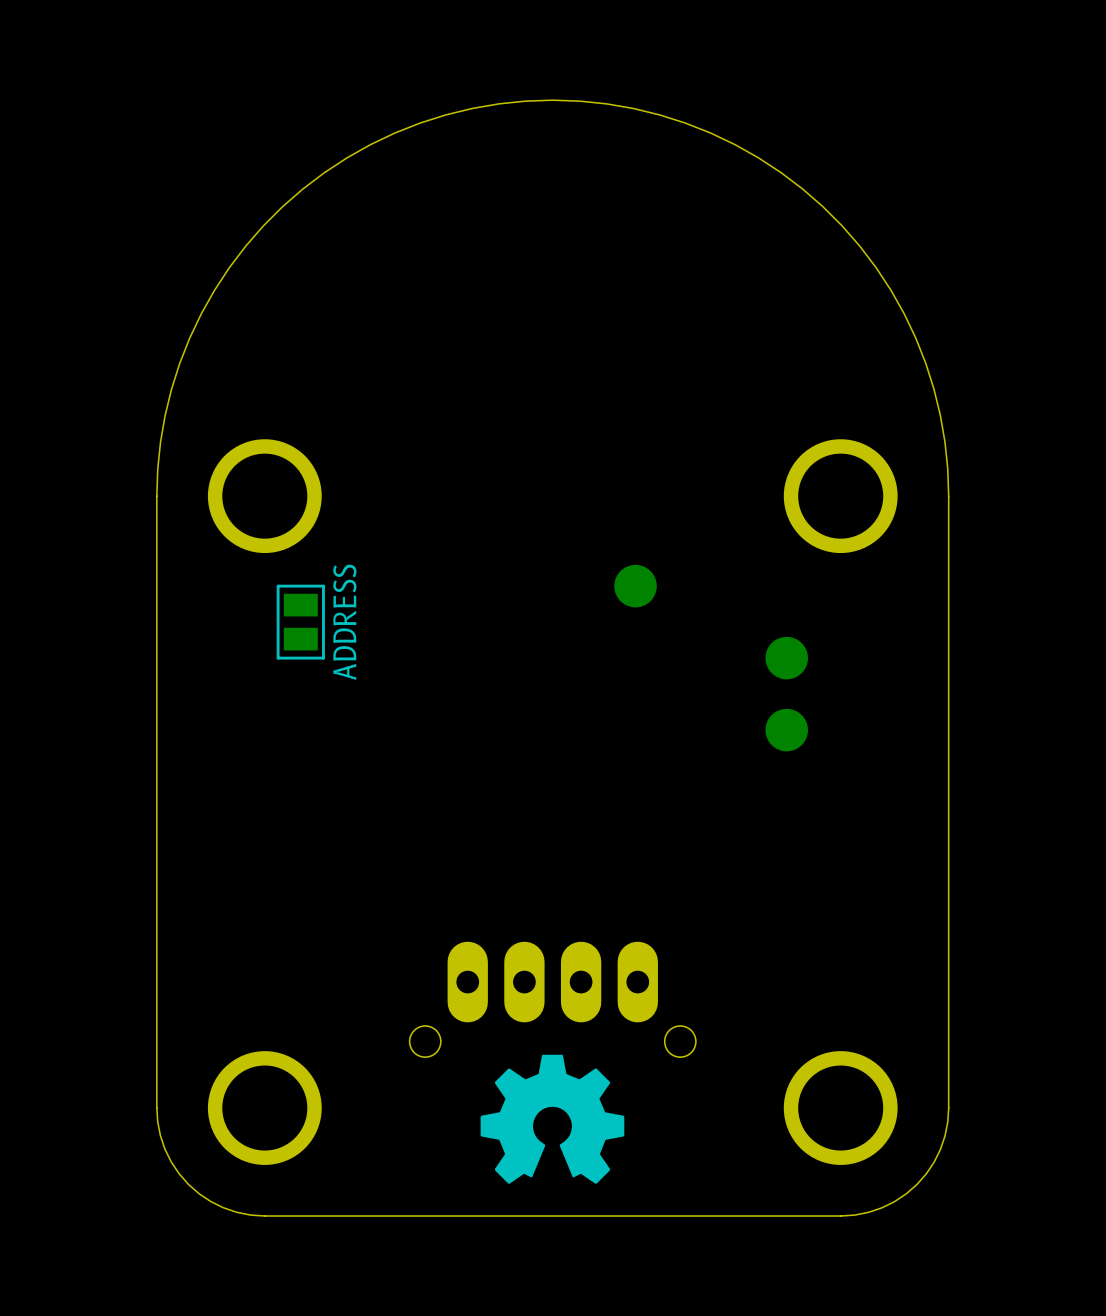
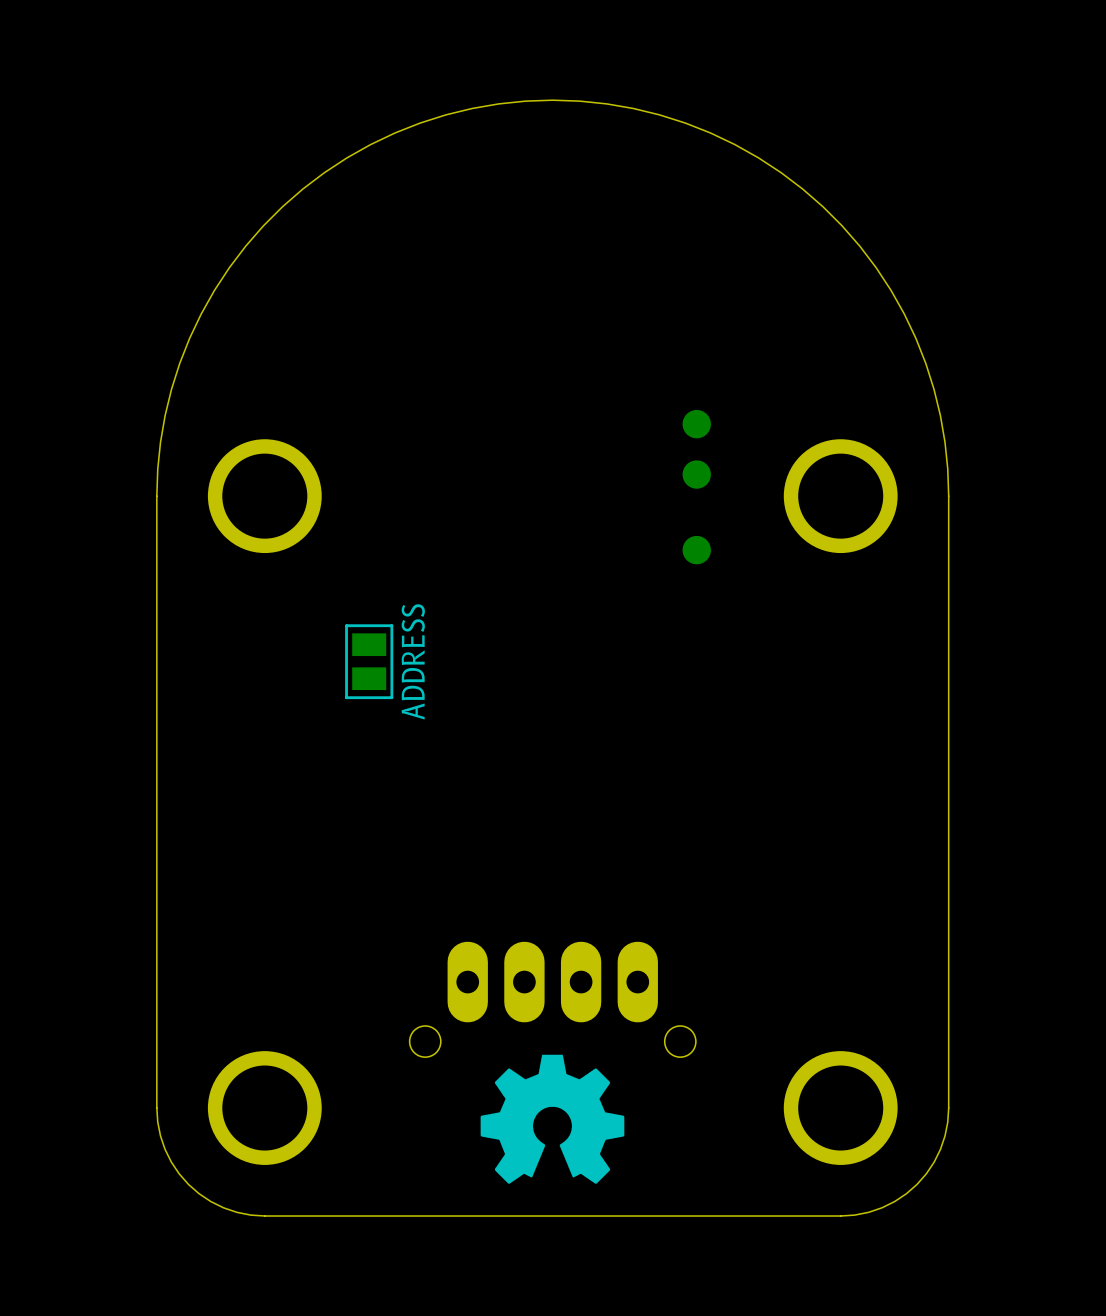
part: none -> (696, 424)
part: none -> (696, 474)
part: none -> (696, 550)
part: (635, 586) -> none
part position: (300, 622) -> (369, 661)
text position: ADDRESS (344, 622) -> ADDRESS (413, 661)
part: (786, 658) -> none
part: (786, 730) -> none

